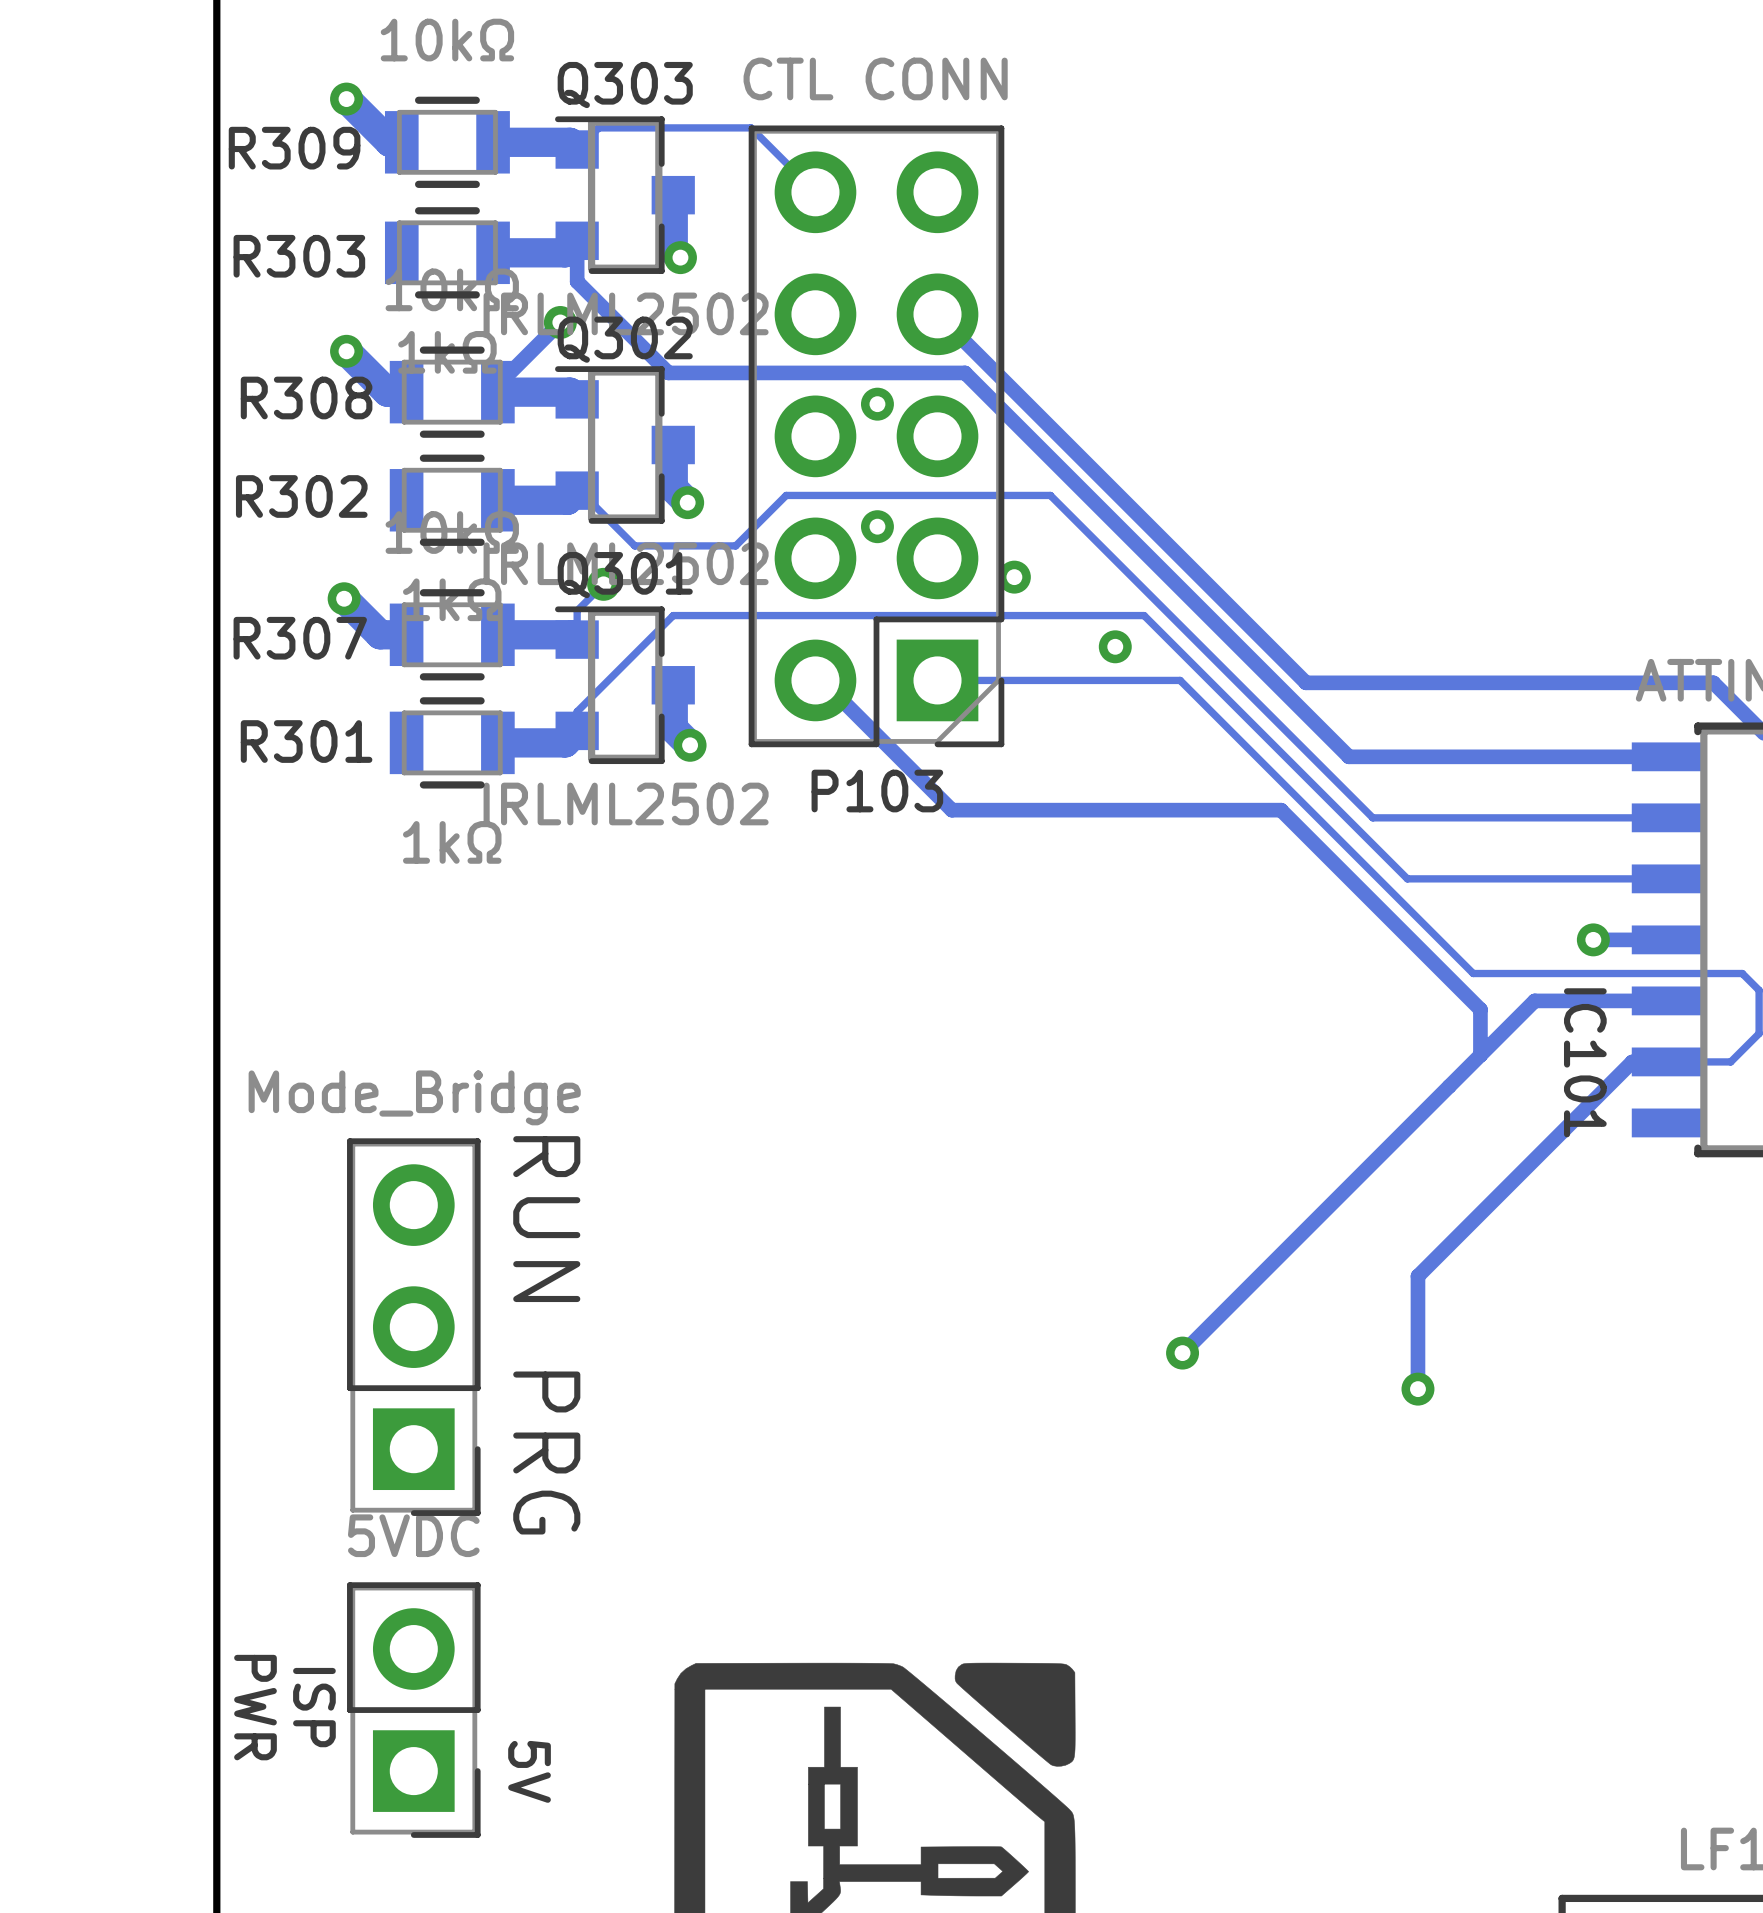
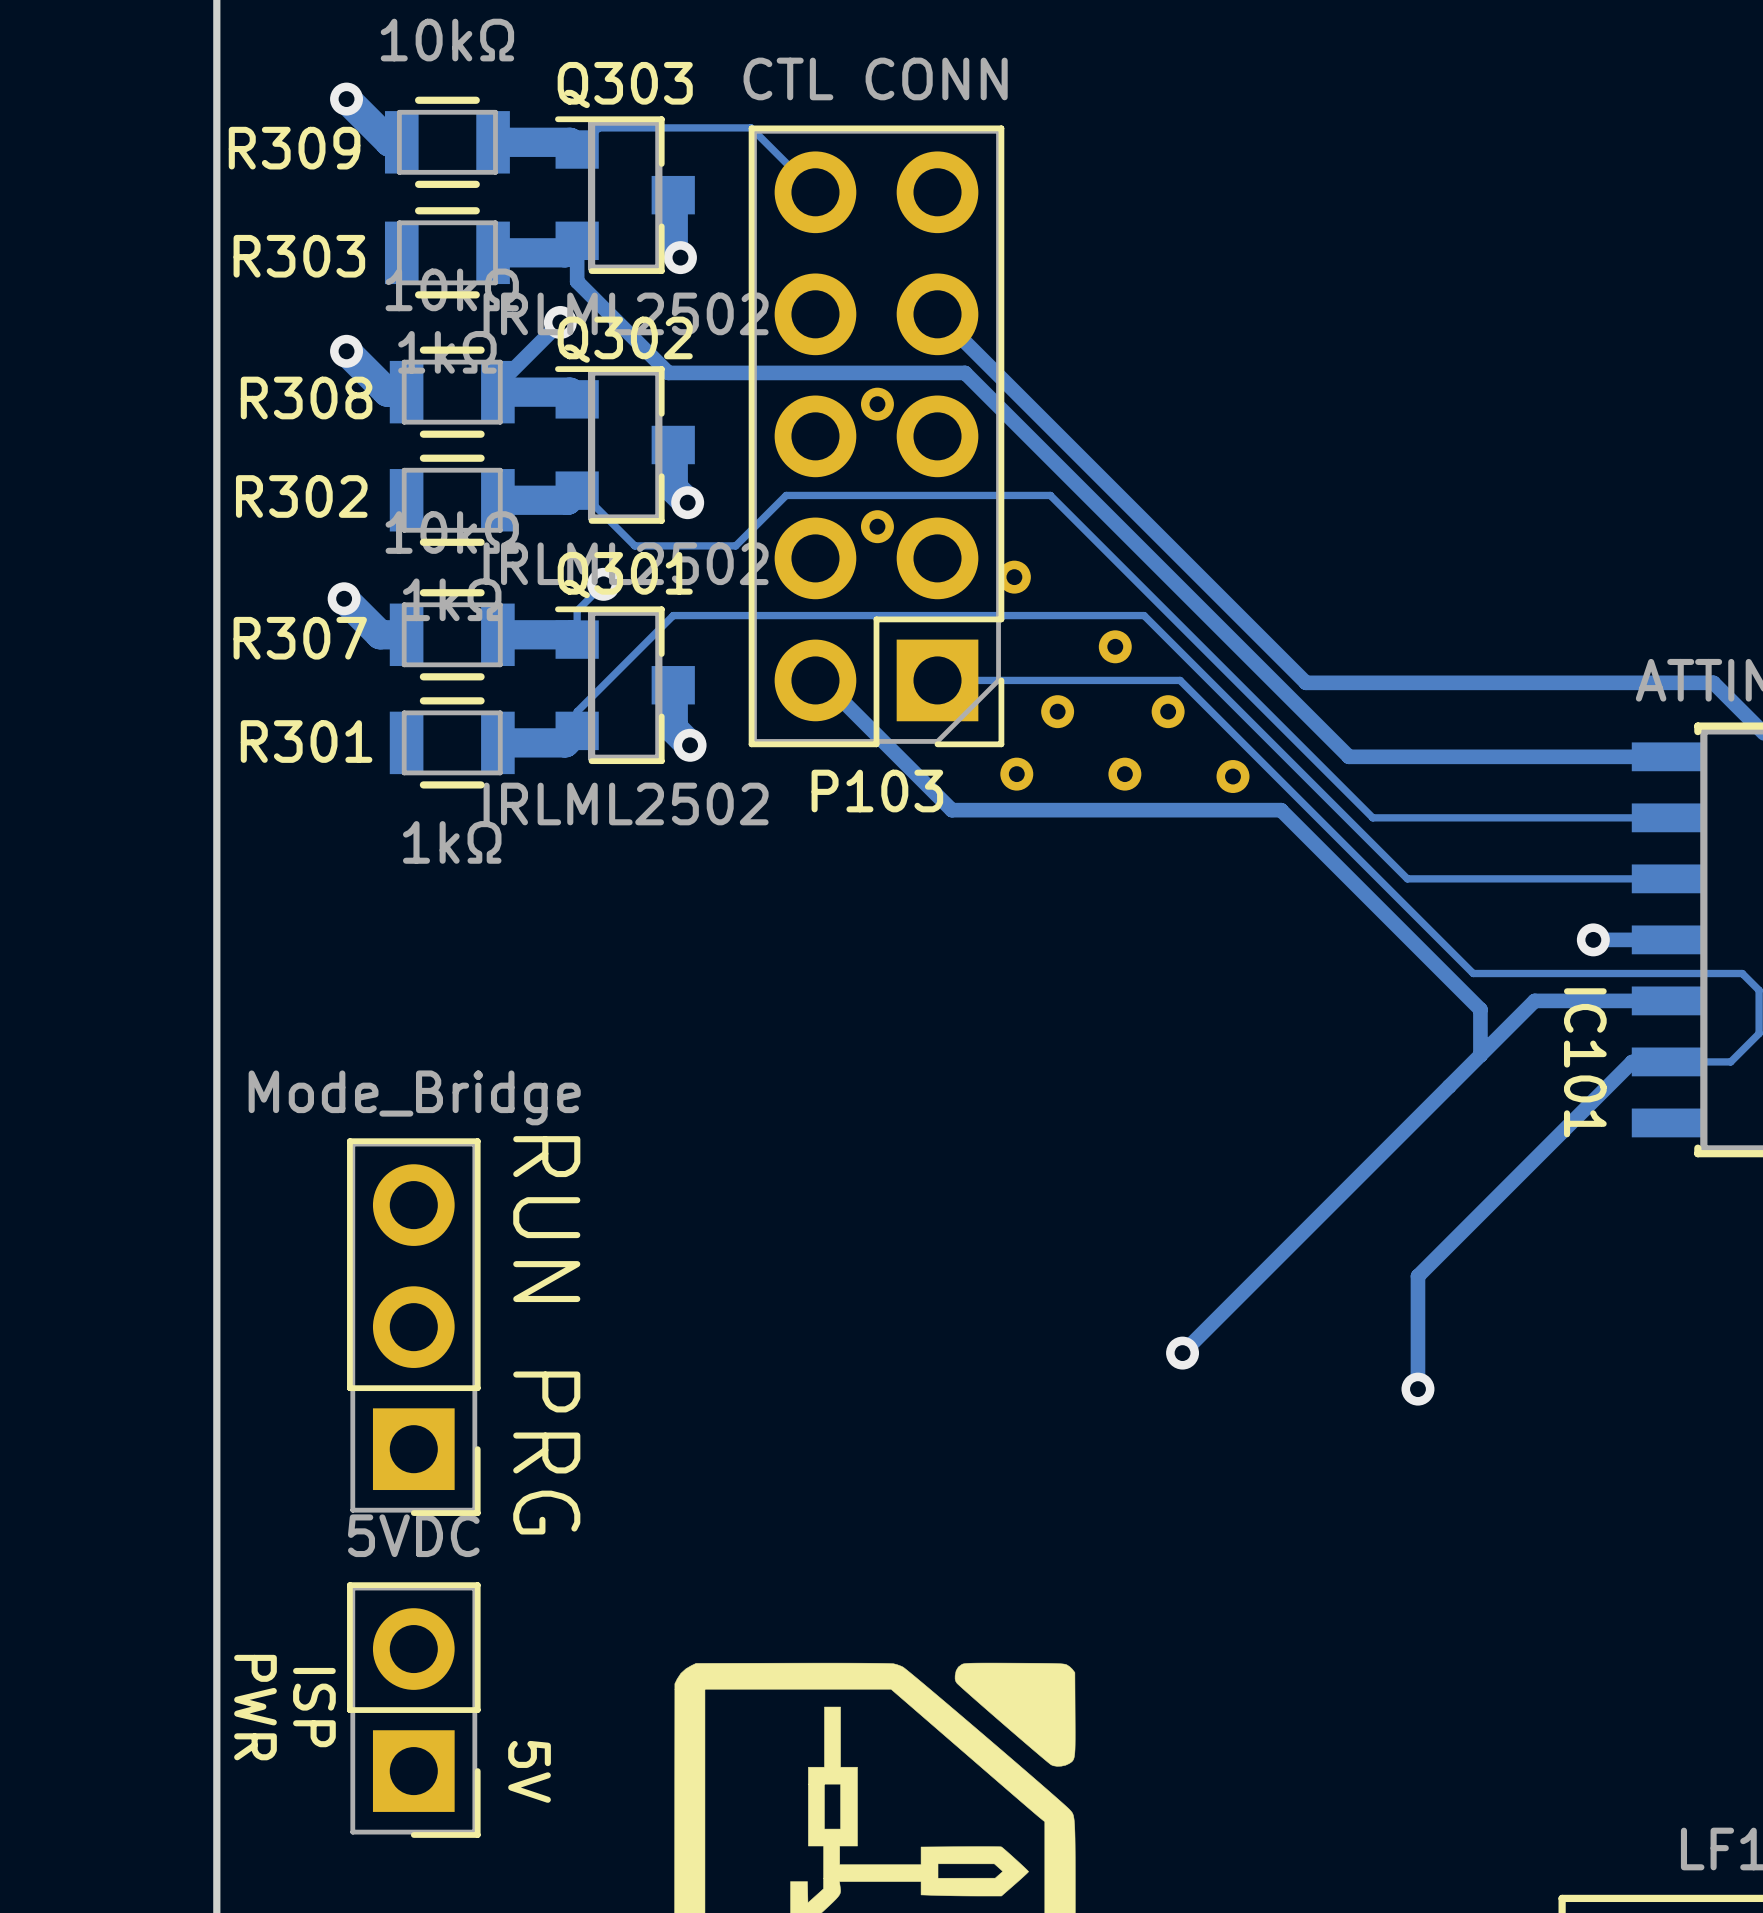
part: none -> (1057, 711)
part: none -> (1168, 711)
part: none -> (1016, 774)
part: none -> (1124, 774)
part: none -> (1233, 776)

